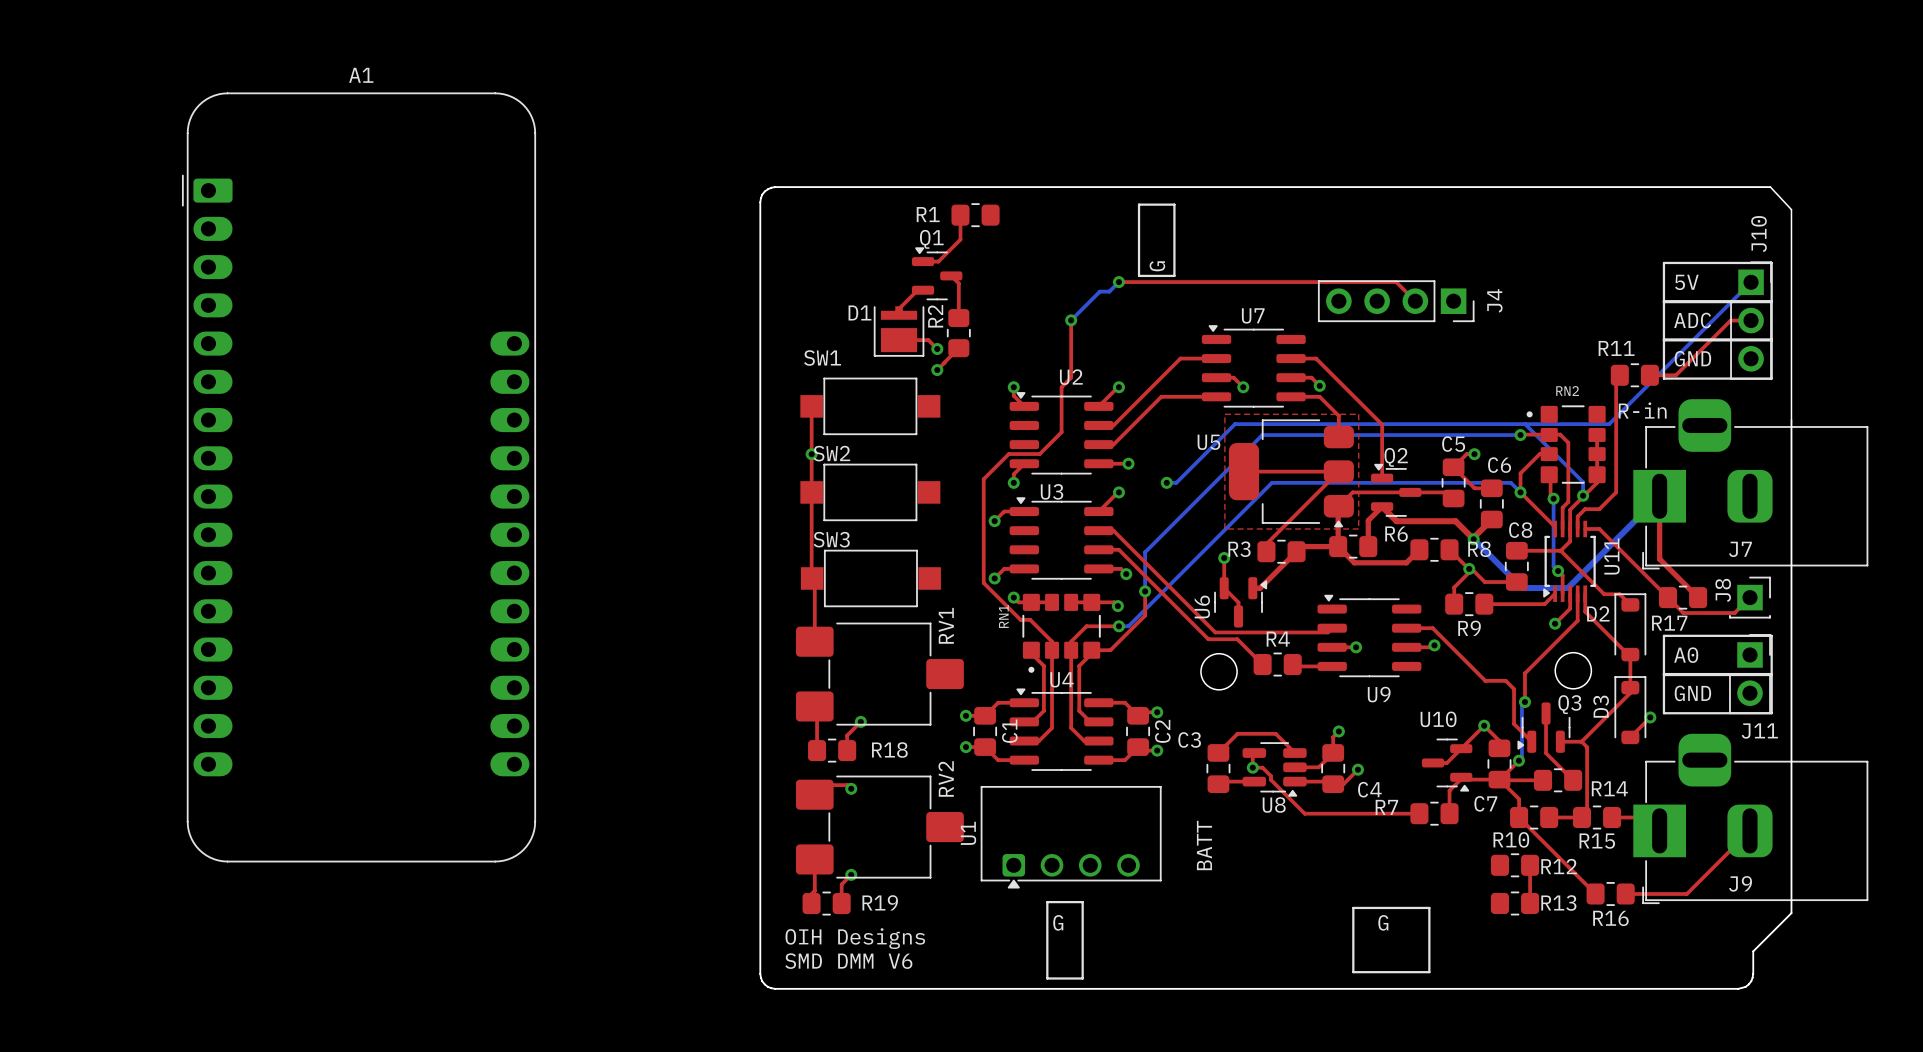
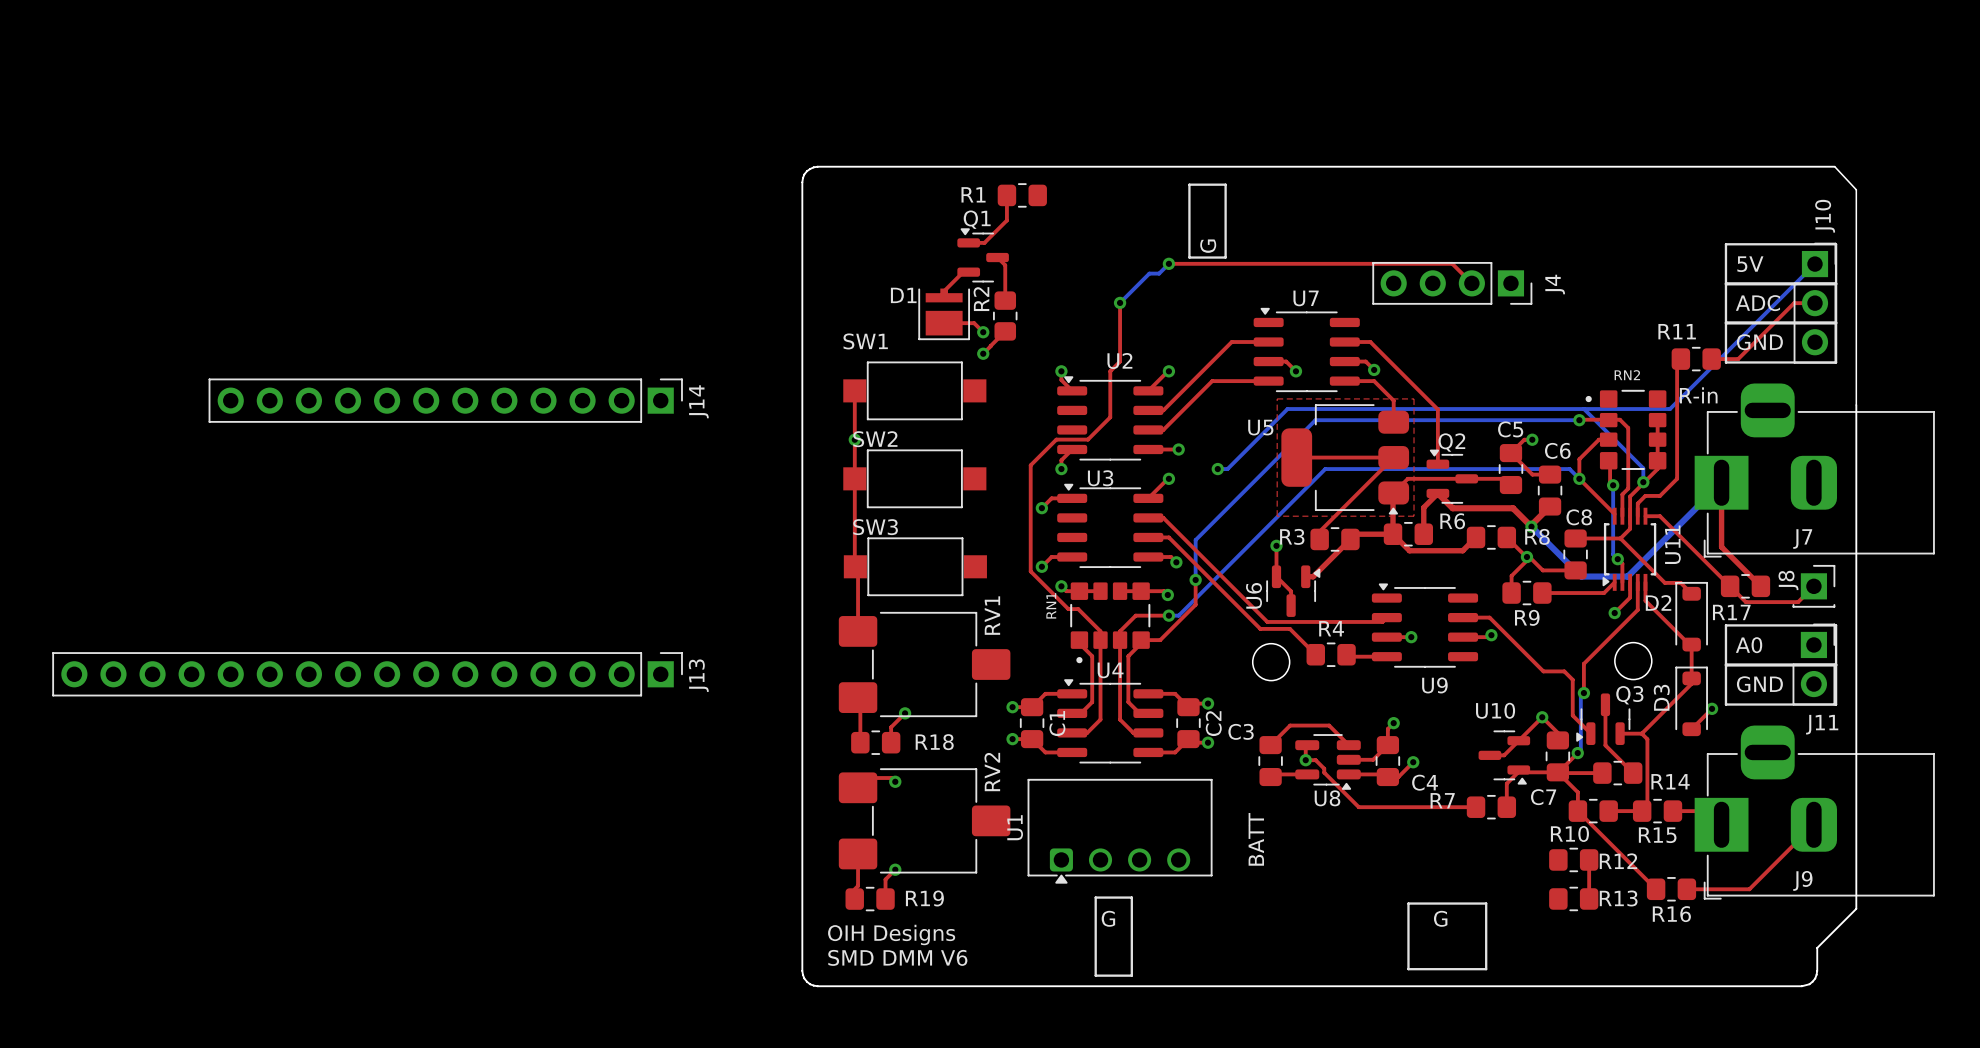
J14: none -> (445, 400)
A1: (359, 477) -> none
J13: none -> (367, 674)

